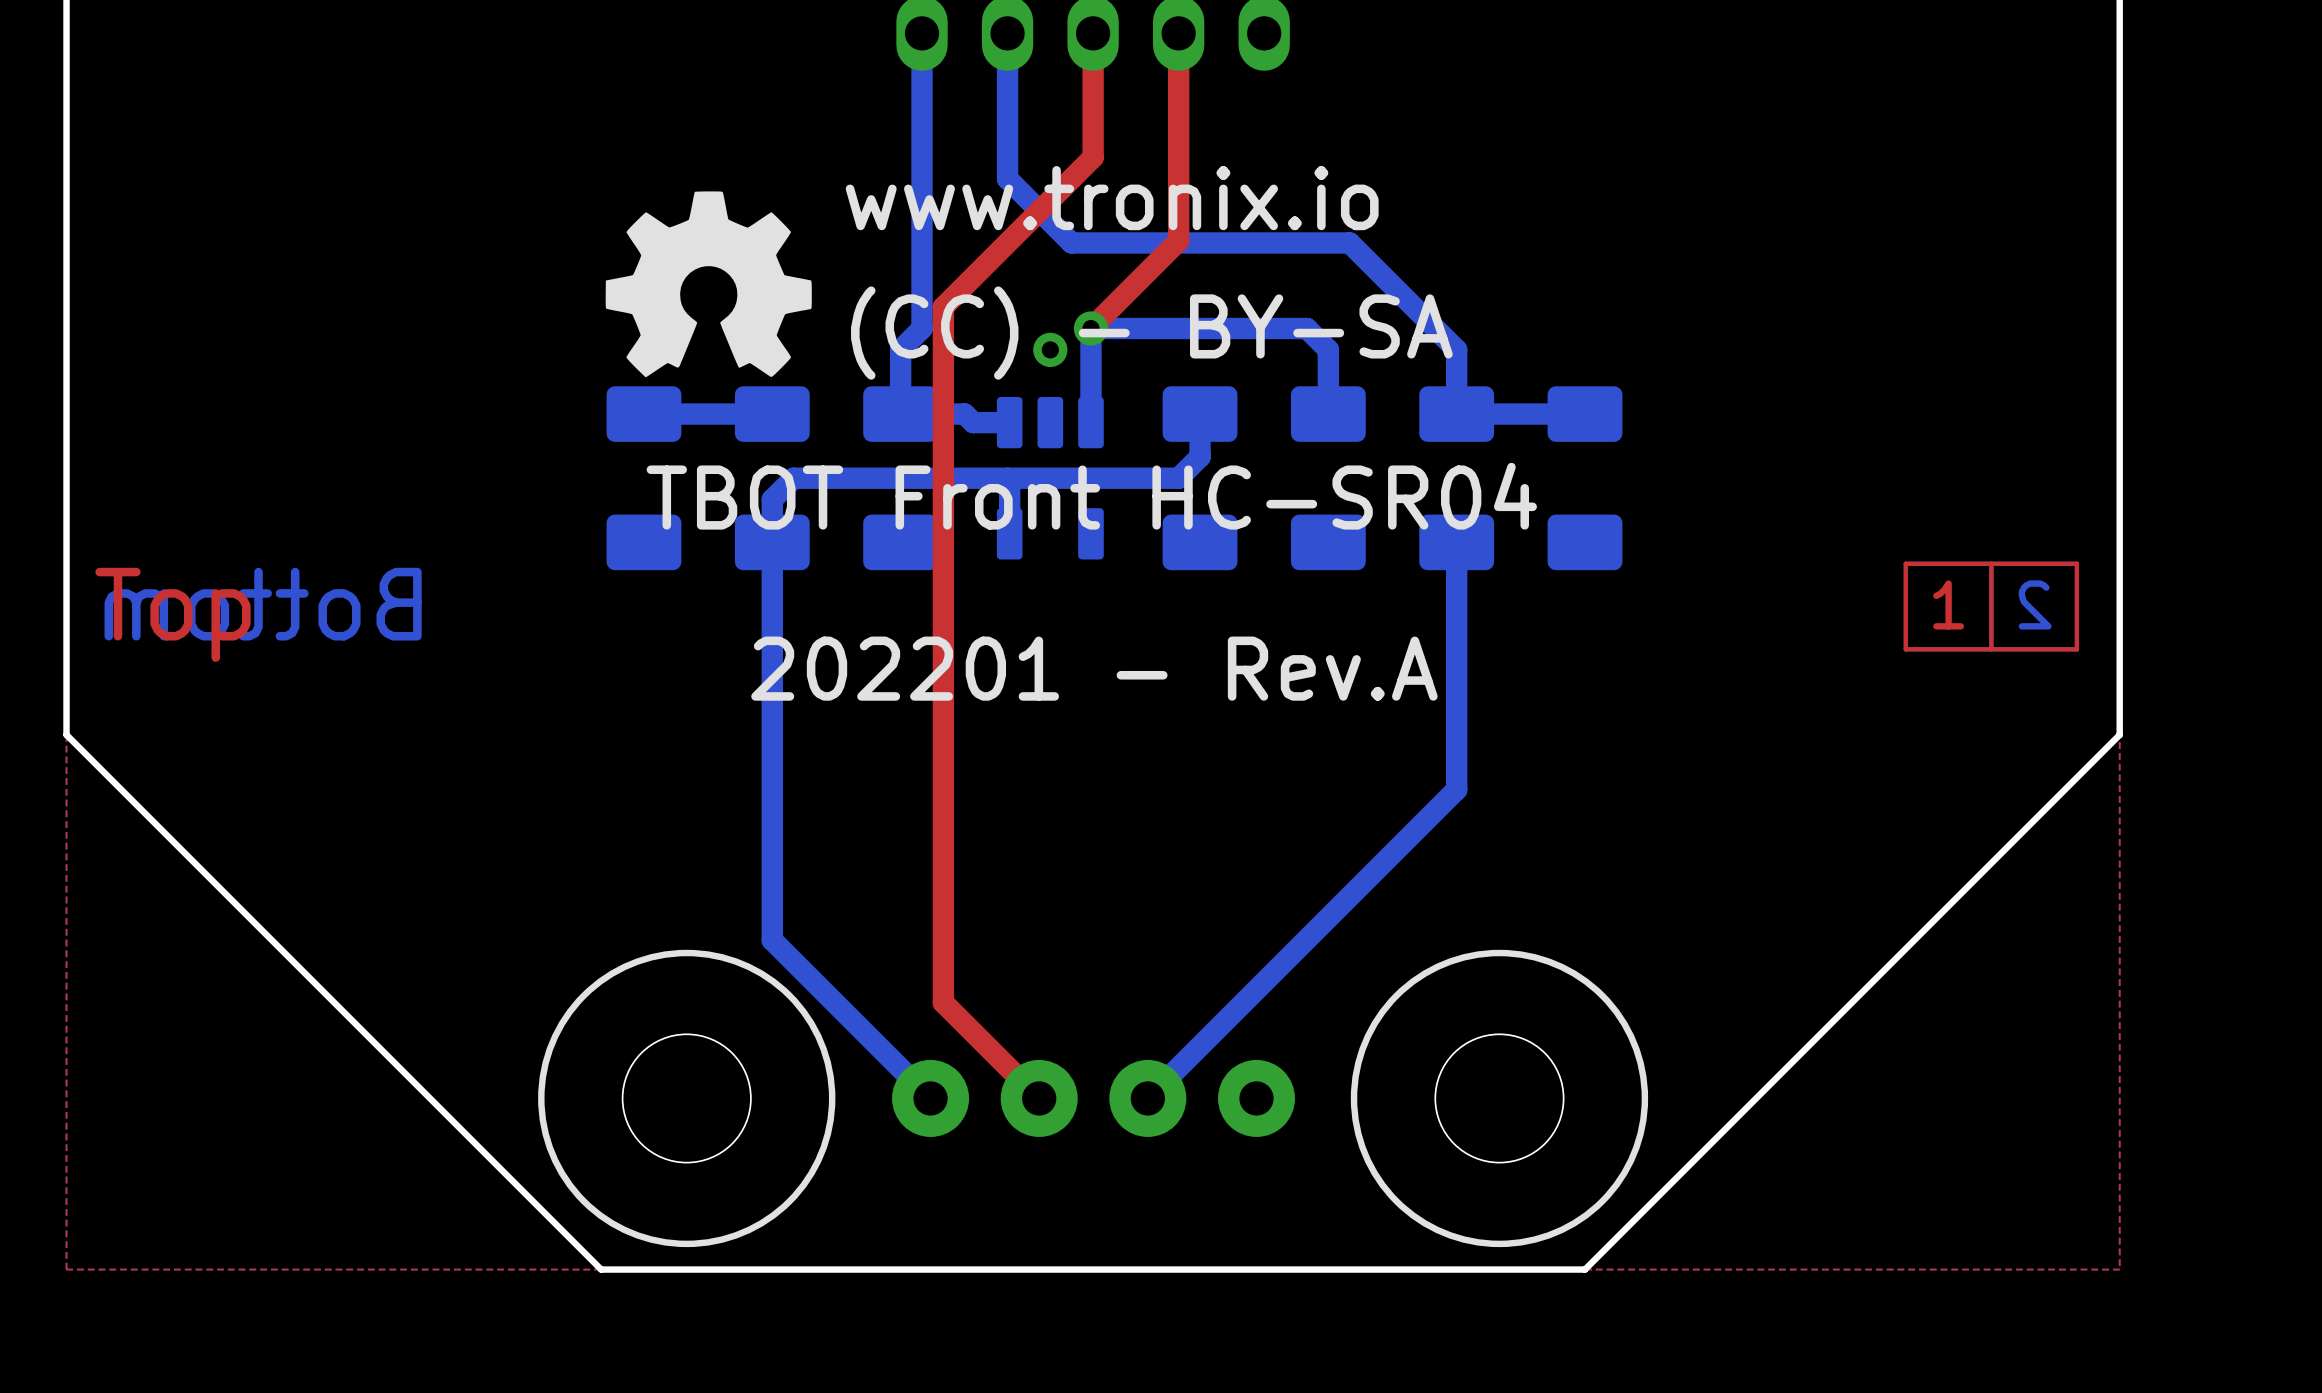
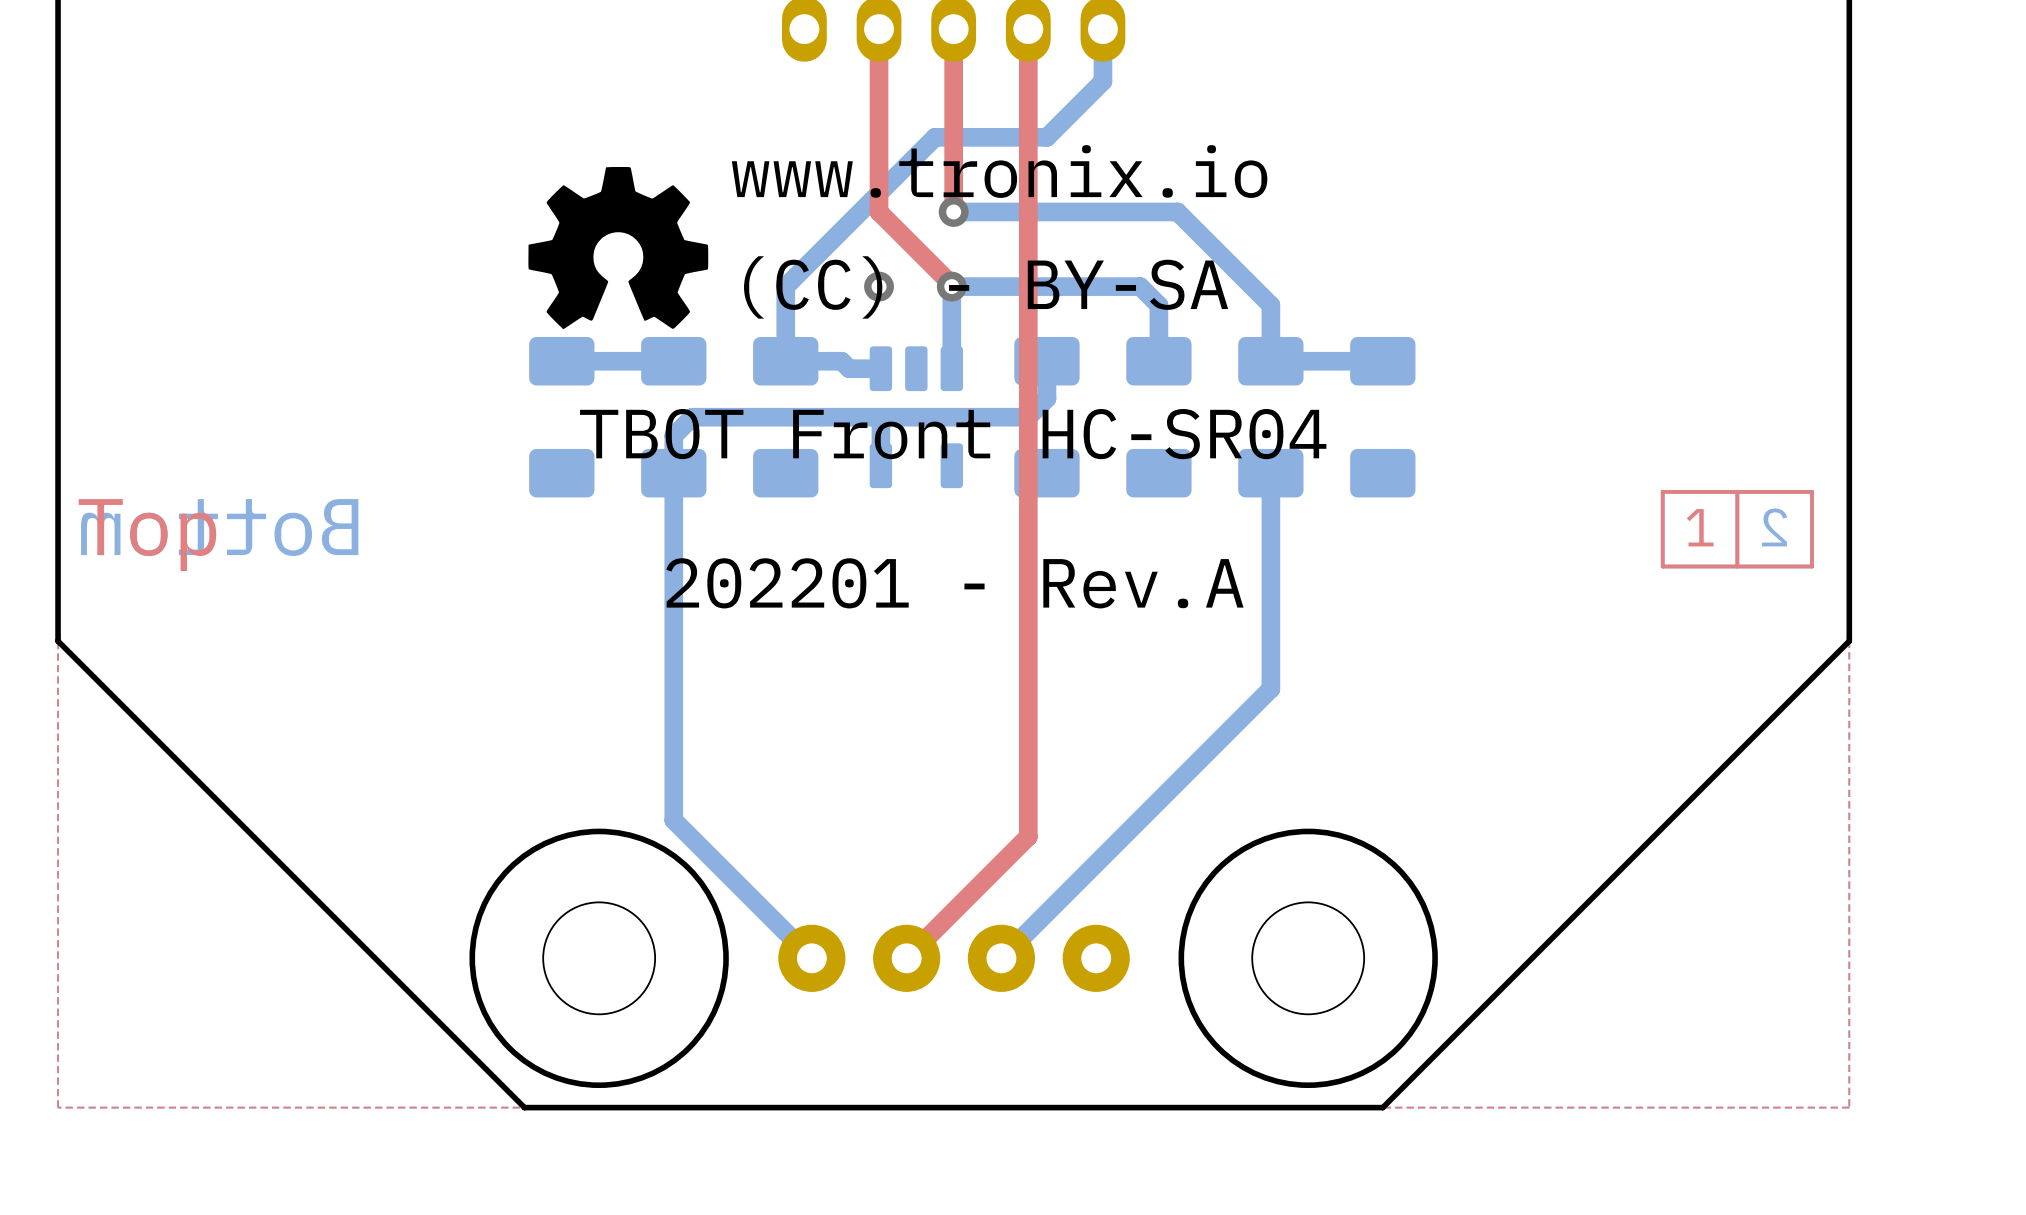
bottom track: (922, 33) (922, 328) (900, 349) -> (1102, 29) (1102, 81) (1046, 137) (935, 137) (785, 286) (785, 305)
top track: none -> (879, 29) (879, 211) (953, 286)
bottom track: (1007, 33) (1007, 178) (1071, 242) (1093, 242) -> none
top track: (1093, 157) (943, 307) (943, 1002) (1039, 1098) -> (1028, 210) (1028, 836) (906, 958)
top track: none -> (953, 137) (953, 211)
top track: (1178, 240) (1090, 328) -> none
via: none -> (953, 211)
via position: (1050, 349) -> (879, 286)

